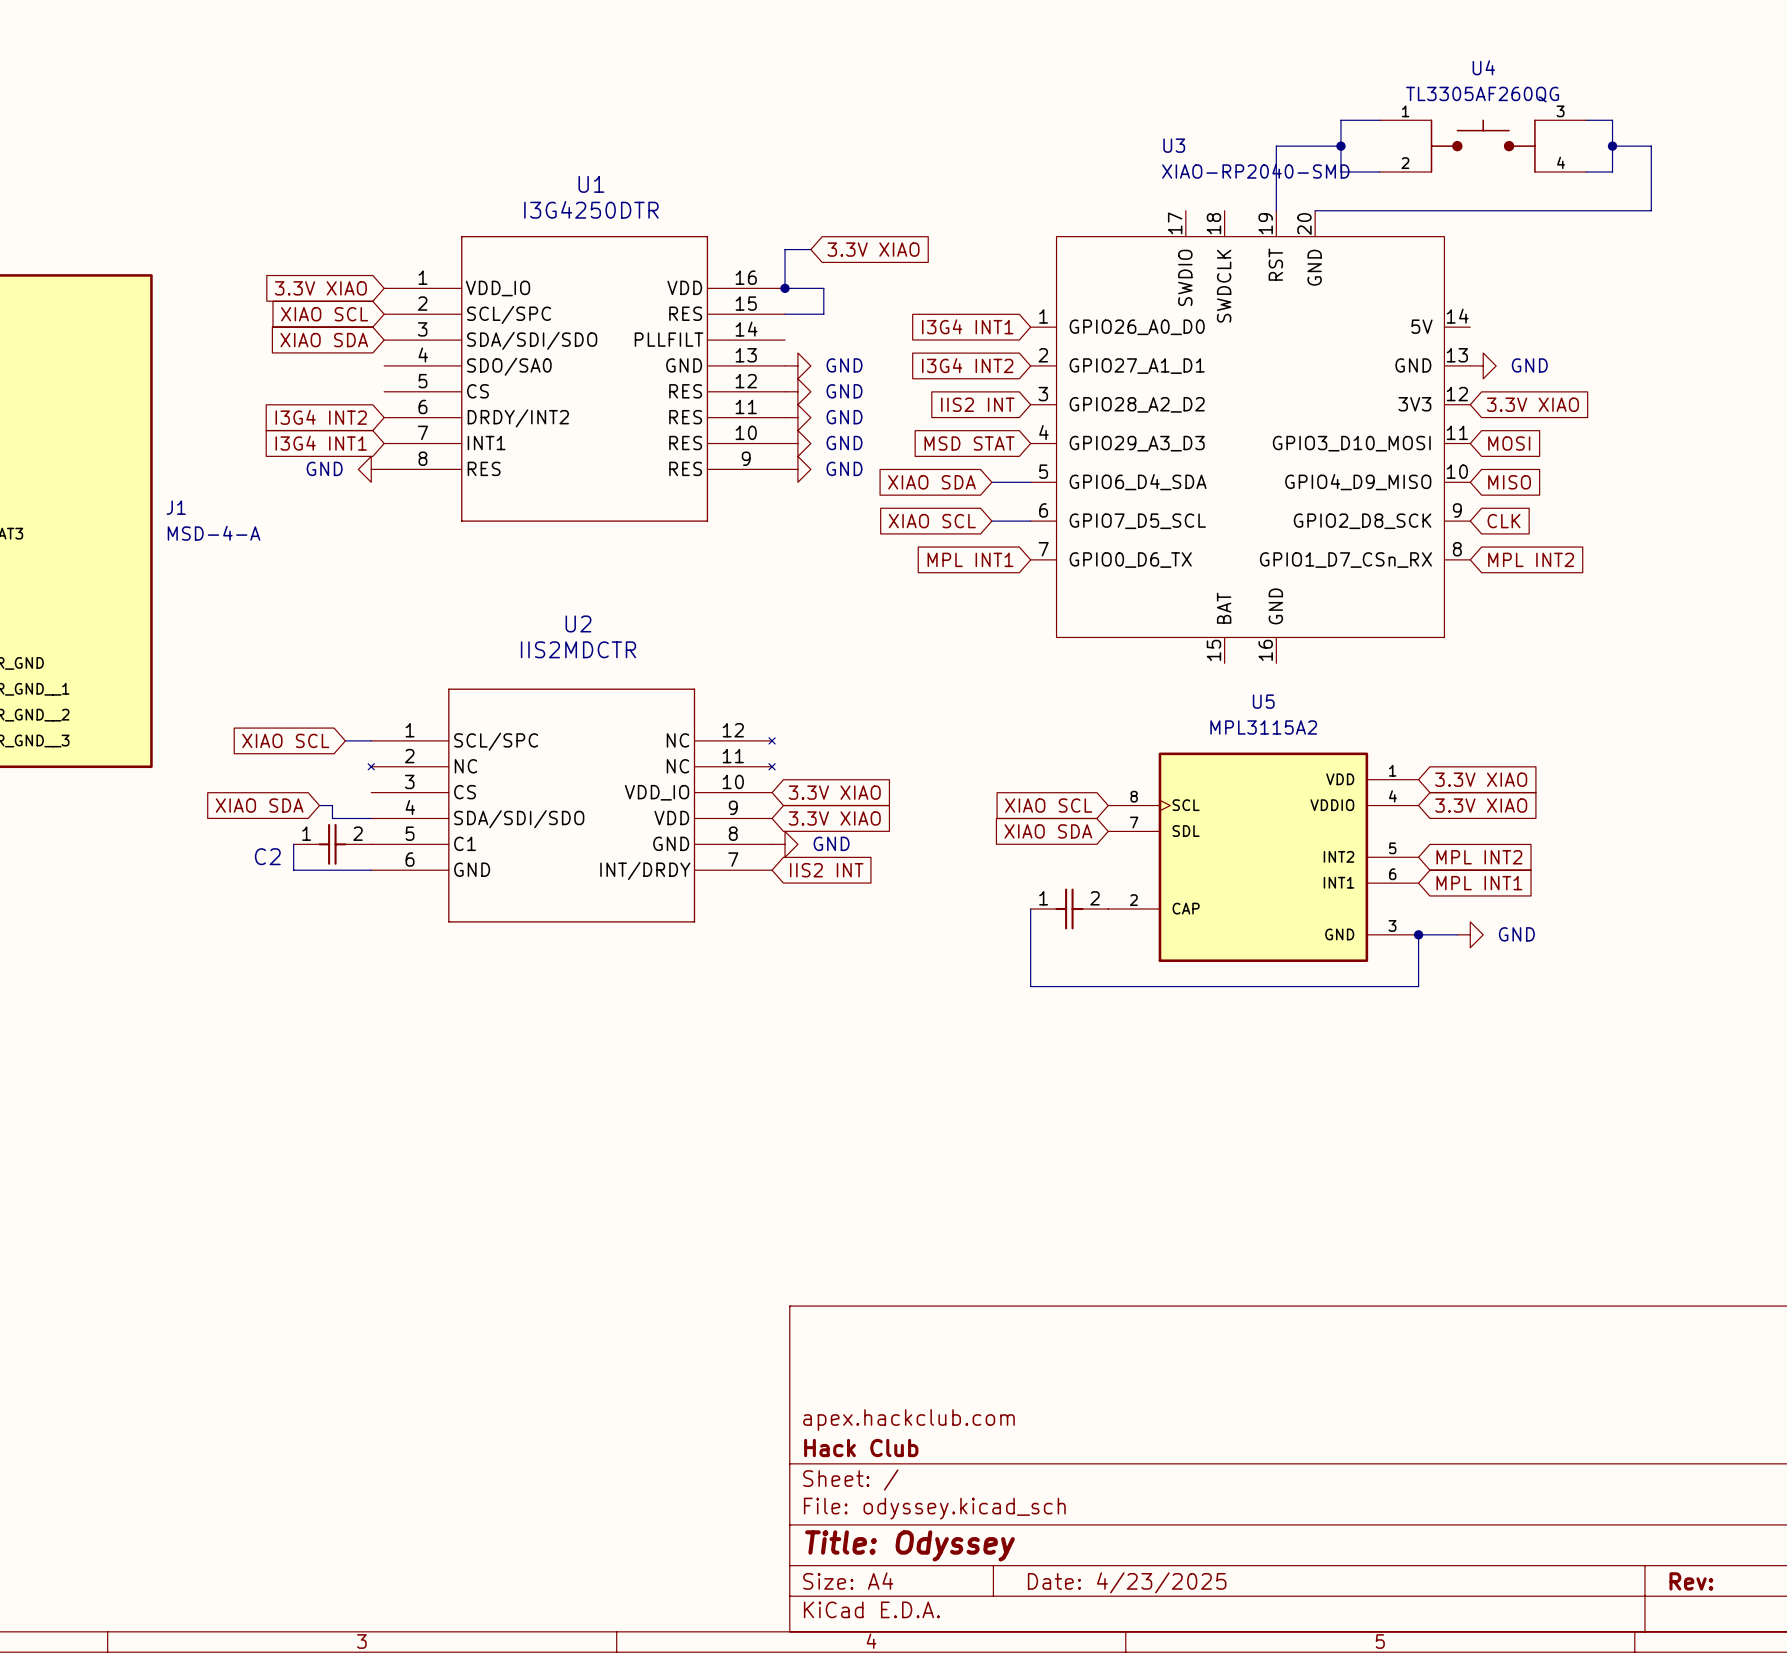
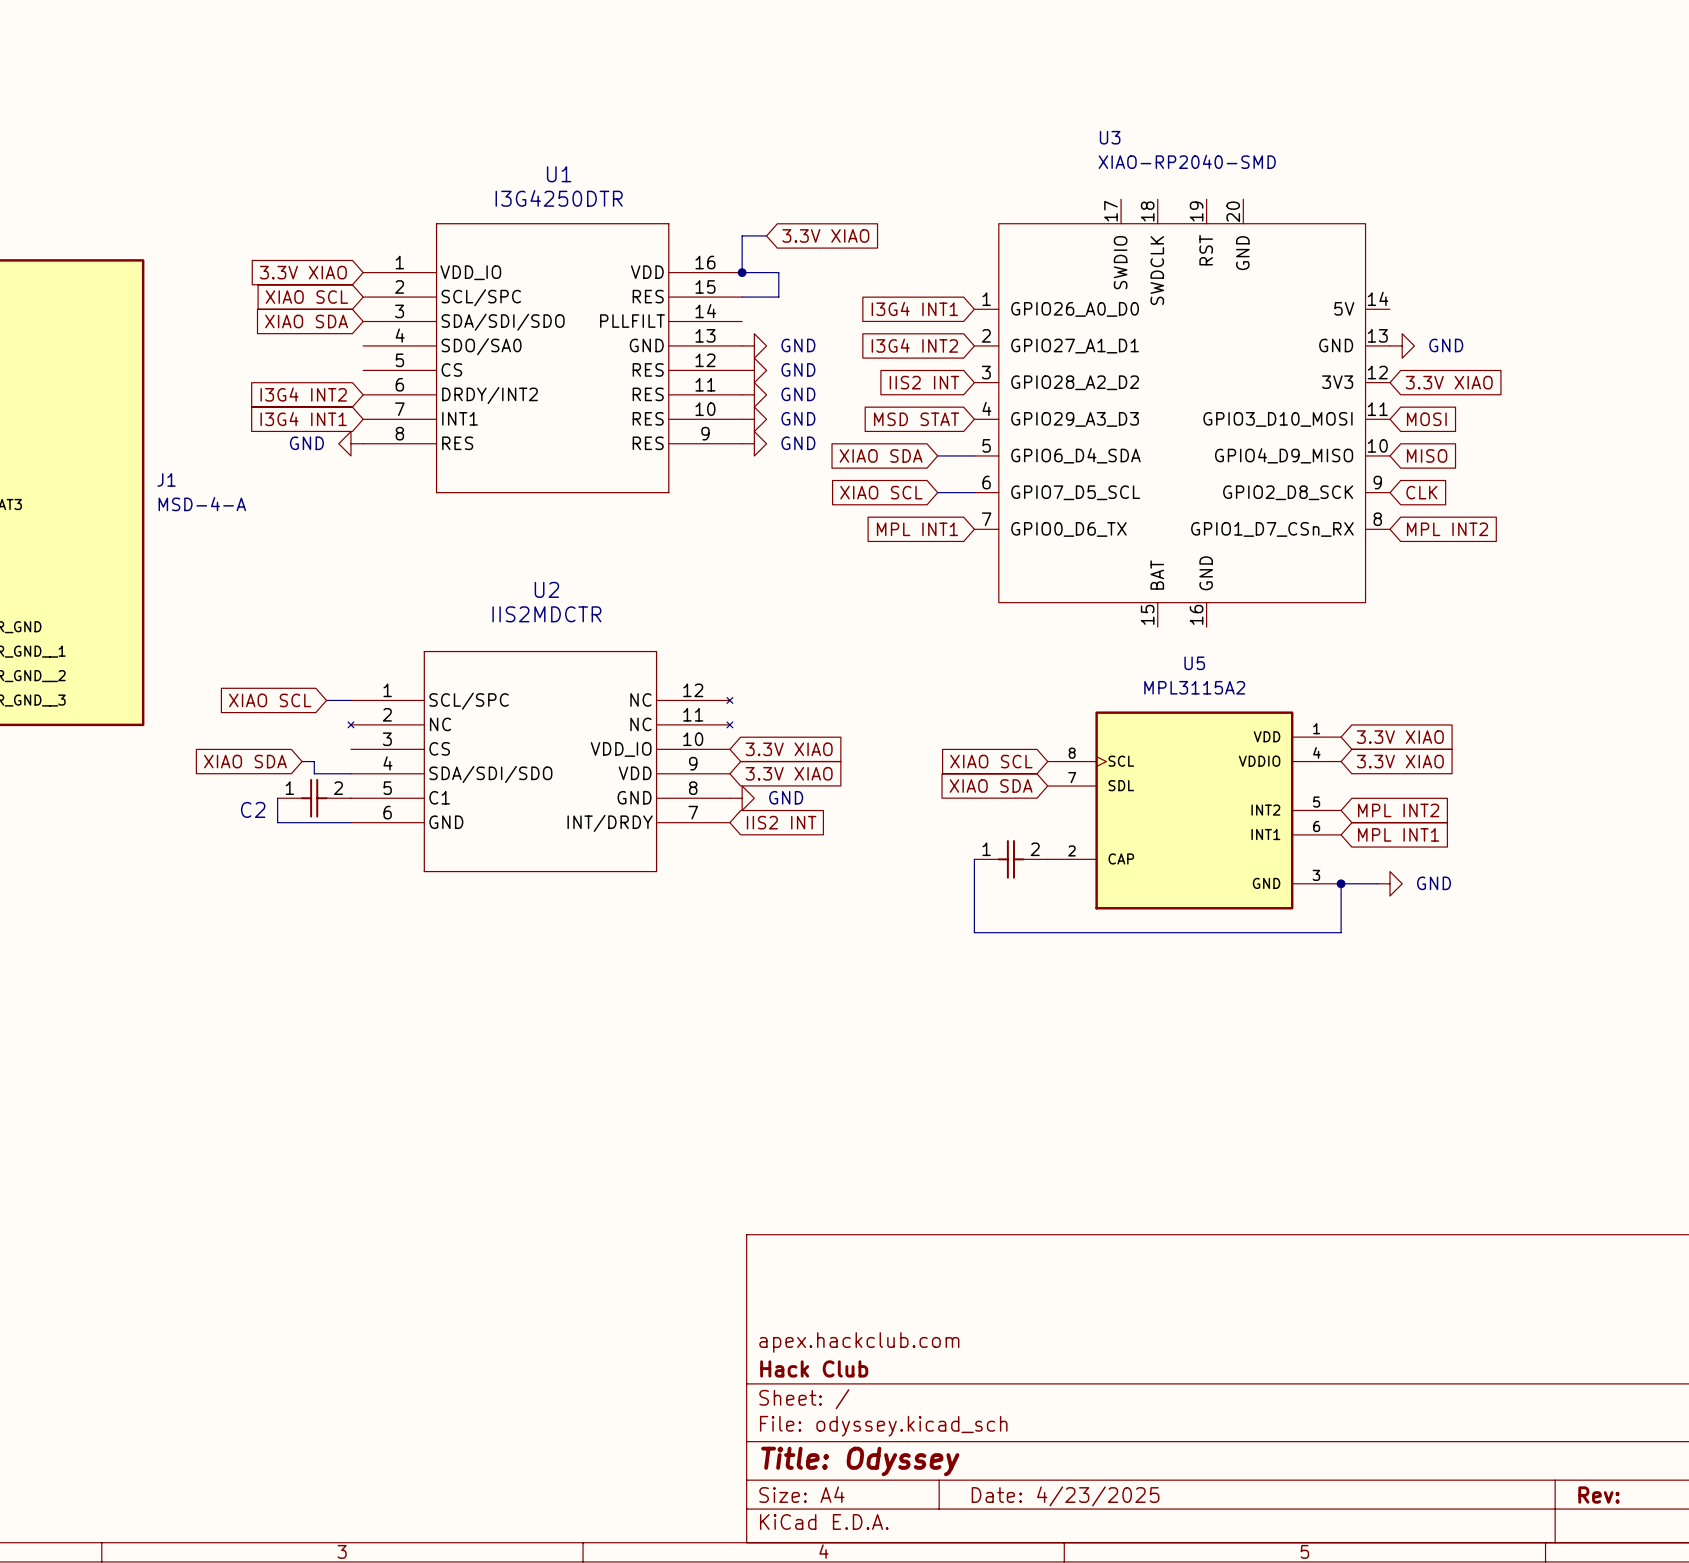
wire: (1379, 120) (1340, 120) (1340, 171) (1379, 171) -> none
wire: (1586, 120) (1612, 120) (1612, 171) (1586, 171) -> none
wire: (1340, 146) (1276, 146) (1276, 210) -> none
junction: (1340, 146) -> none
U4: TL3305AF260QG (1483, 146) -> none
wire: (1612, 146) (1651, 146) (1651, 210) (1315, 210) -> none
junction: (1612, 146) -> none

